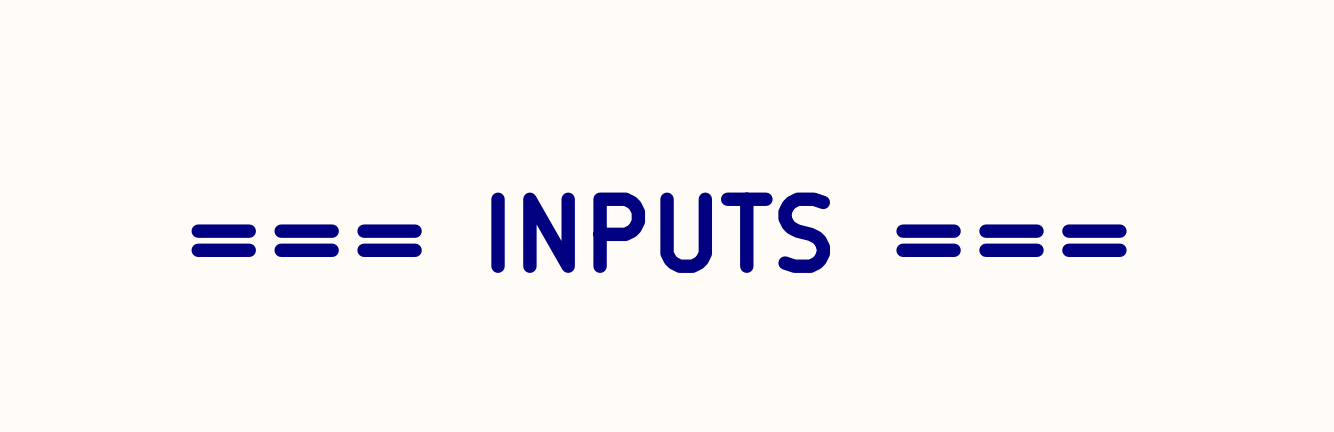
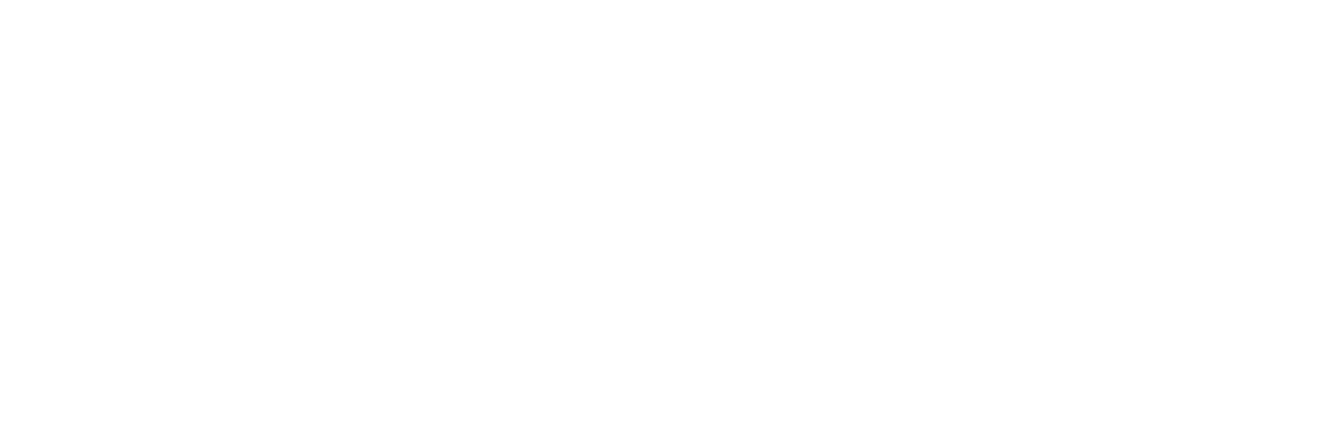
text: === INPUTS === (659, 232) -> none

